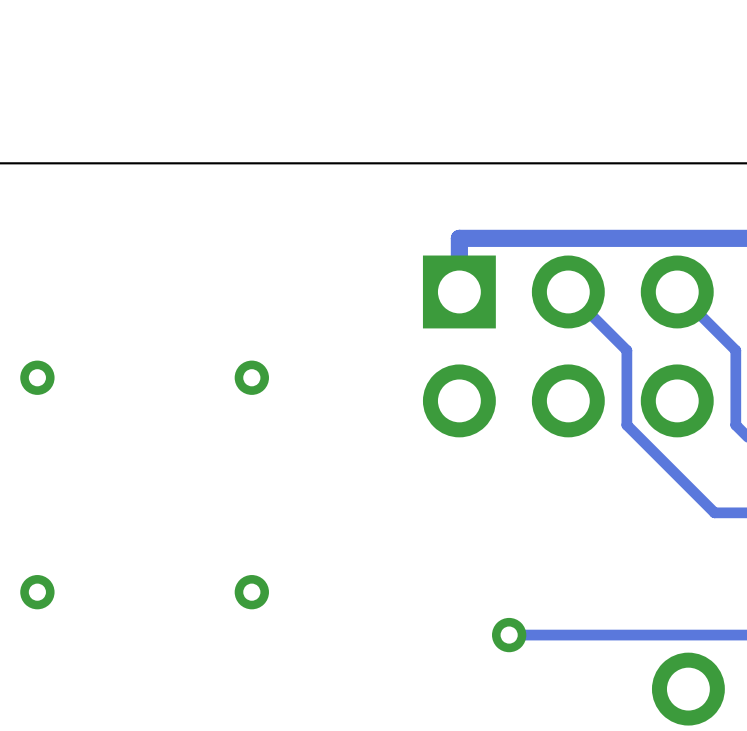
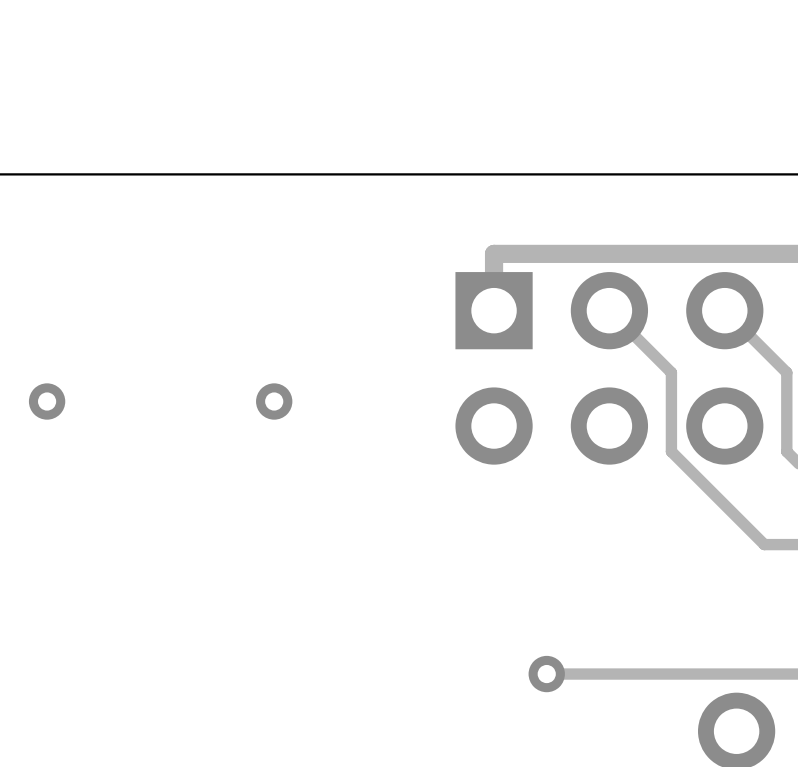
via: (37, 592) -> none
via: (251, 592) -> none

